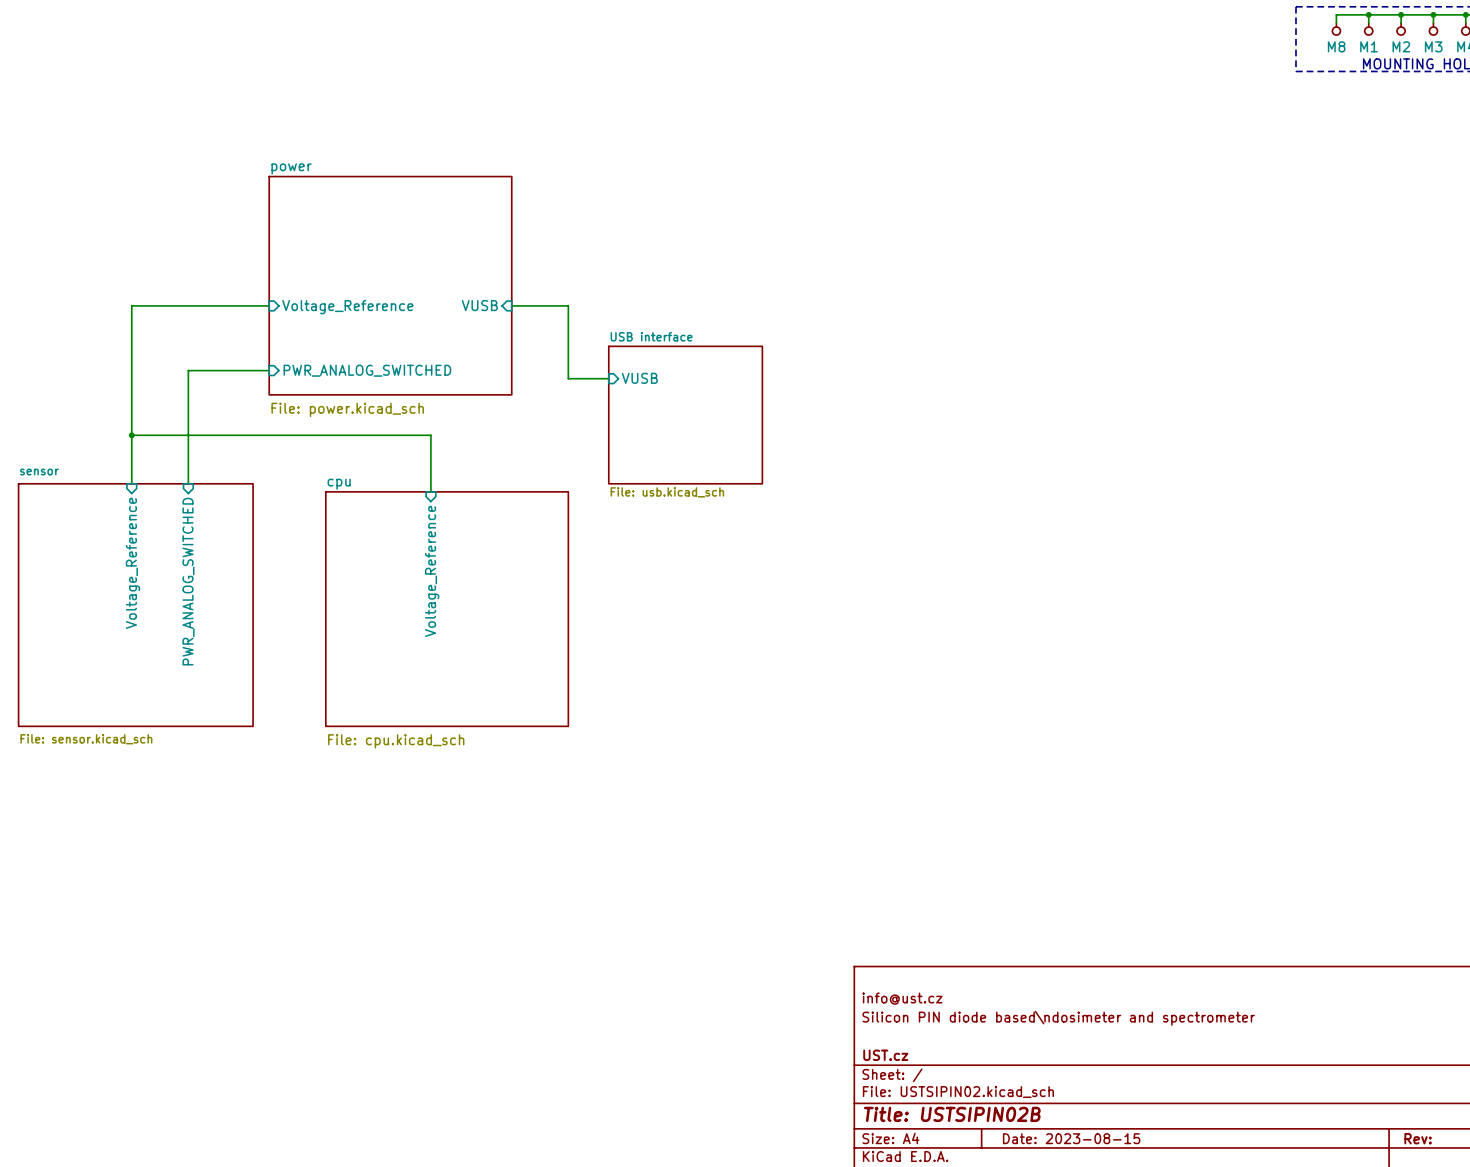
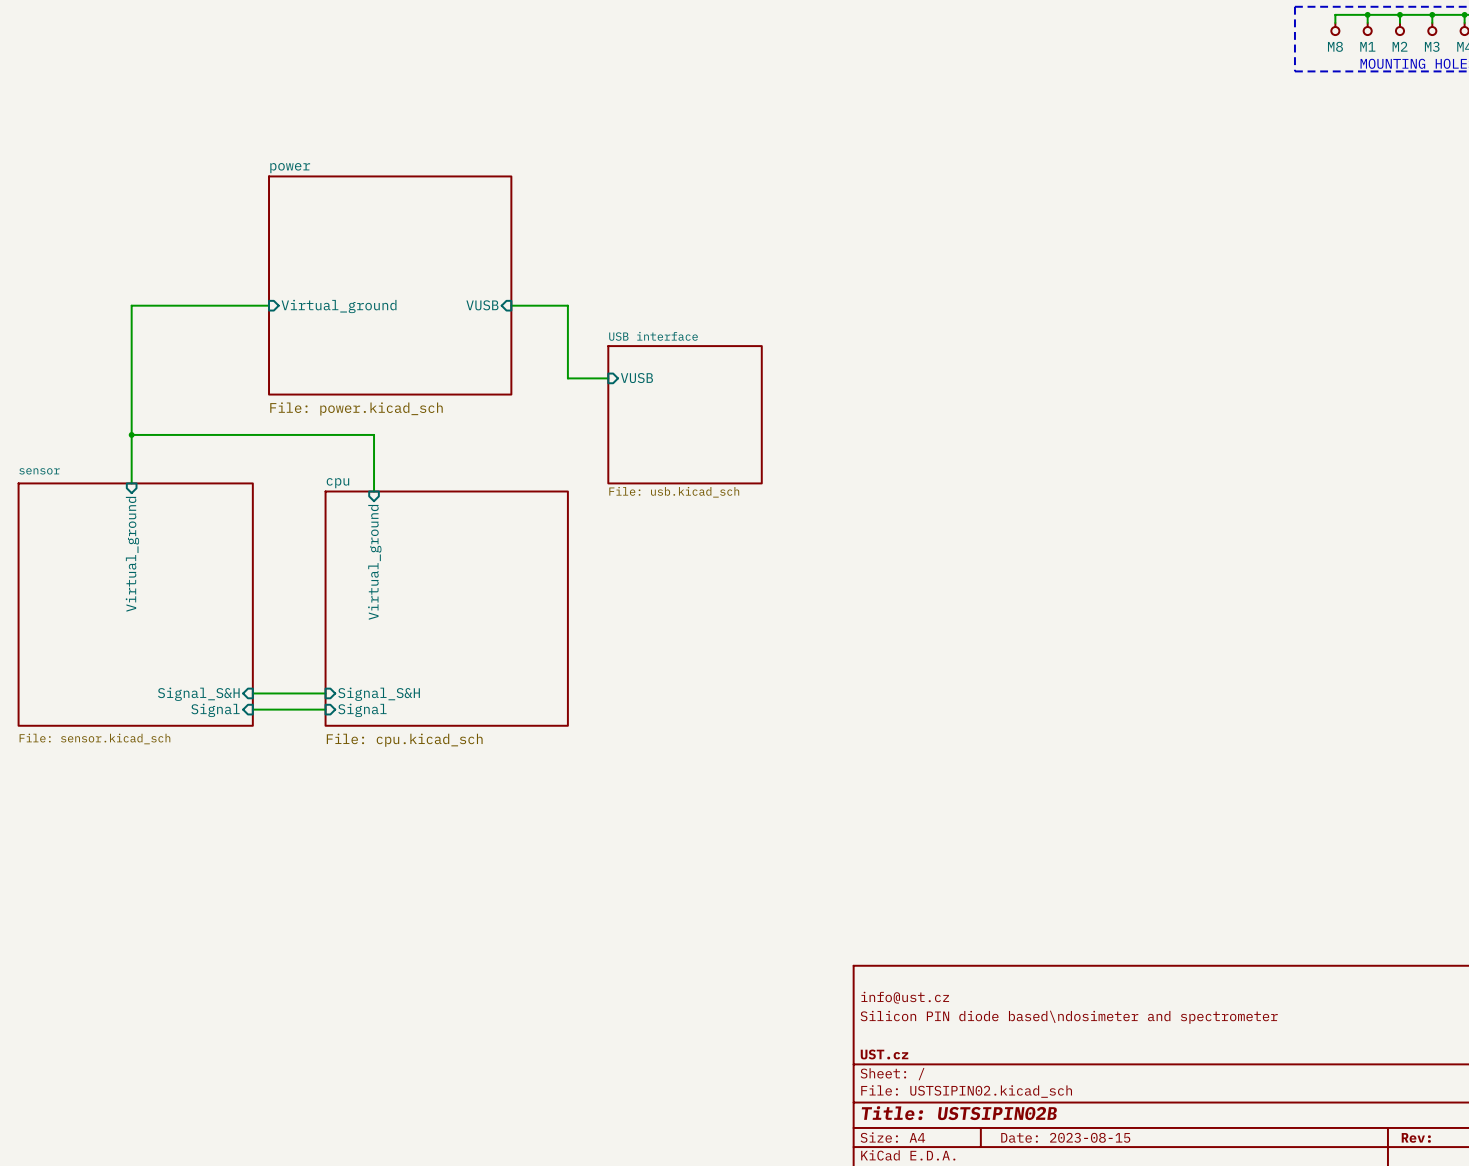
sheet pin: Voltage_Reference (347, 307) -> Virtual_ground (339, 306)
wire: (269, 370) (188, 370) (188, 483) -> none
sheet pin: PWR_ANALOG_SWITCHED (367, 370) -> none
wire: (374, 435) (430, 435) (430, 491) -> (374, 434) (374, 491)
sheet pin: none -> Virtual_ground (374, 562)
sheet pin: Voltage_Reference (133, 563) -> Virtual_ground (132, 554)
sheet pin: Voltage_Reference (432, 571) -> none
sheet pin: PWR_ANALOG_SWITCHED (188, 581) -> none
wire: none -> (252, 693) (325, 693)
sheet pin: none -> Signal_S&H (198, 694)
sheet pin: none -> Signal_S&H (379, 694)
wire: none -> (252, 709) (325, 709)
sheet pin: none -> Signal (215, 710)
sheet pin: none -> Signal (362, 710)

